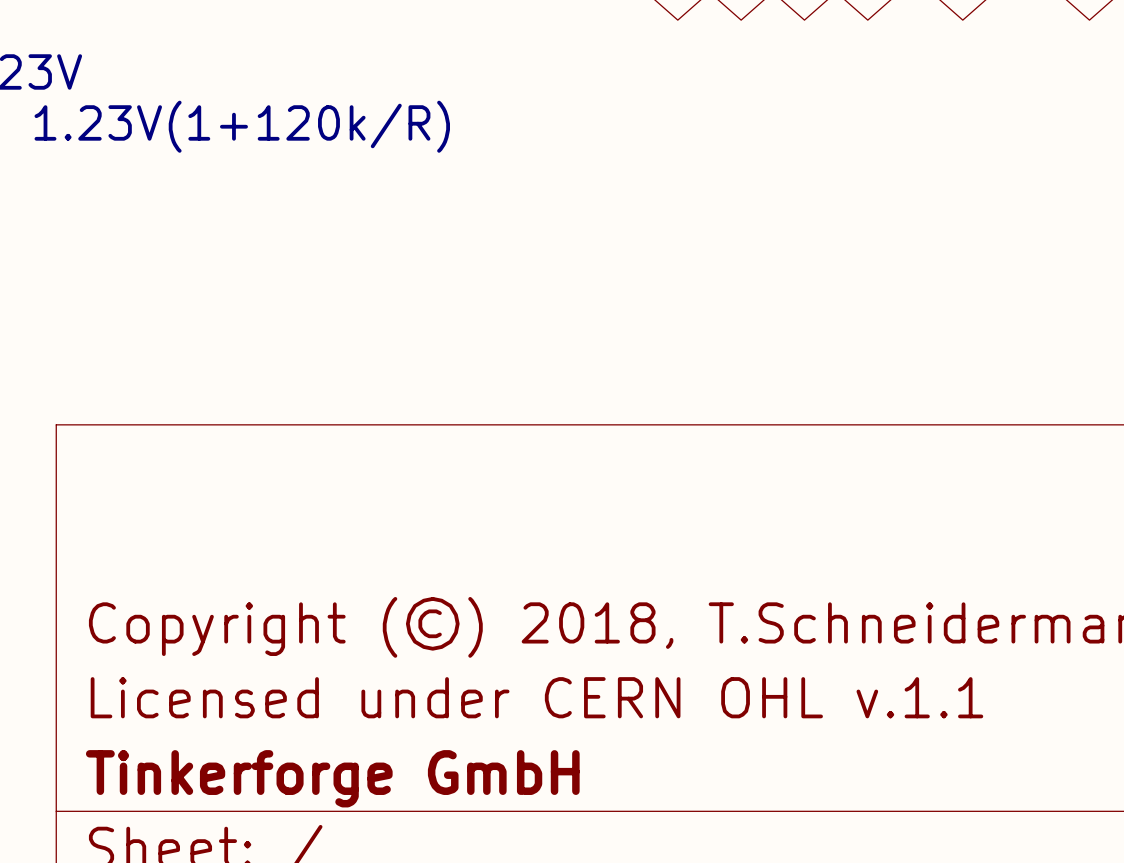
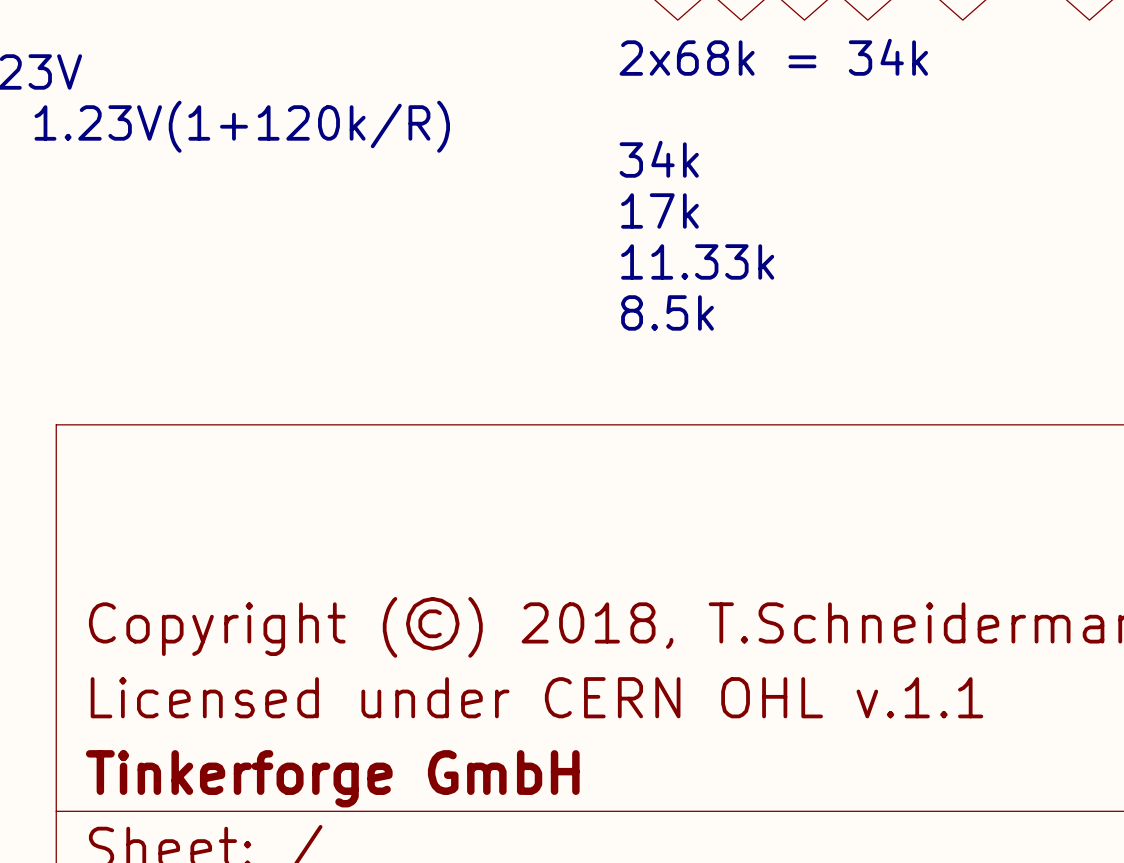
text: none -> 2x68k = 34k (773, 57)
text: none -> 34k (659, 159)
text: none -> 17k (659, 210)
text: none -> 11.33k (697, 261)
text: none -> 8.5k (667, 312)

